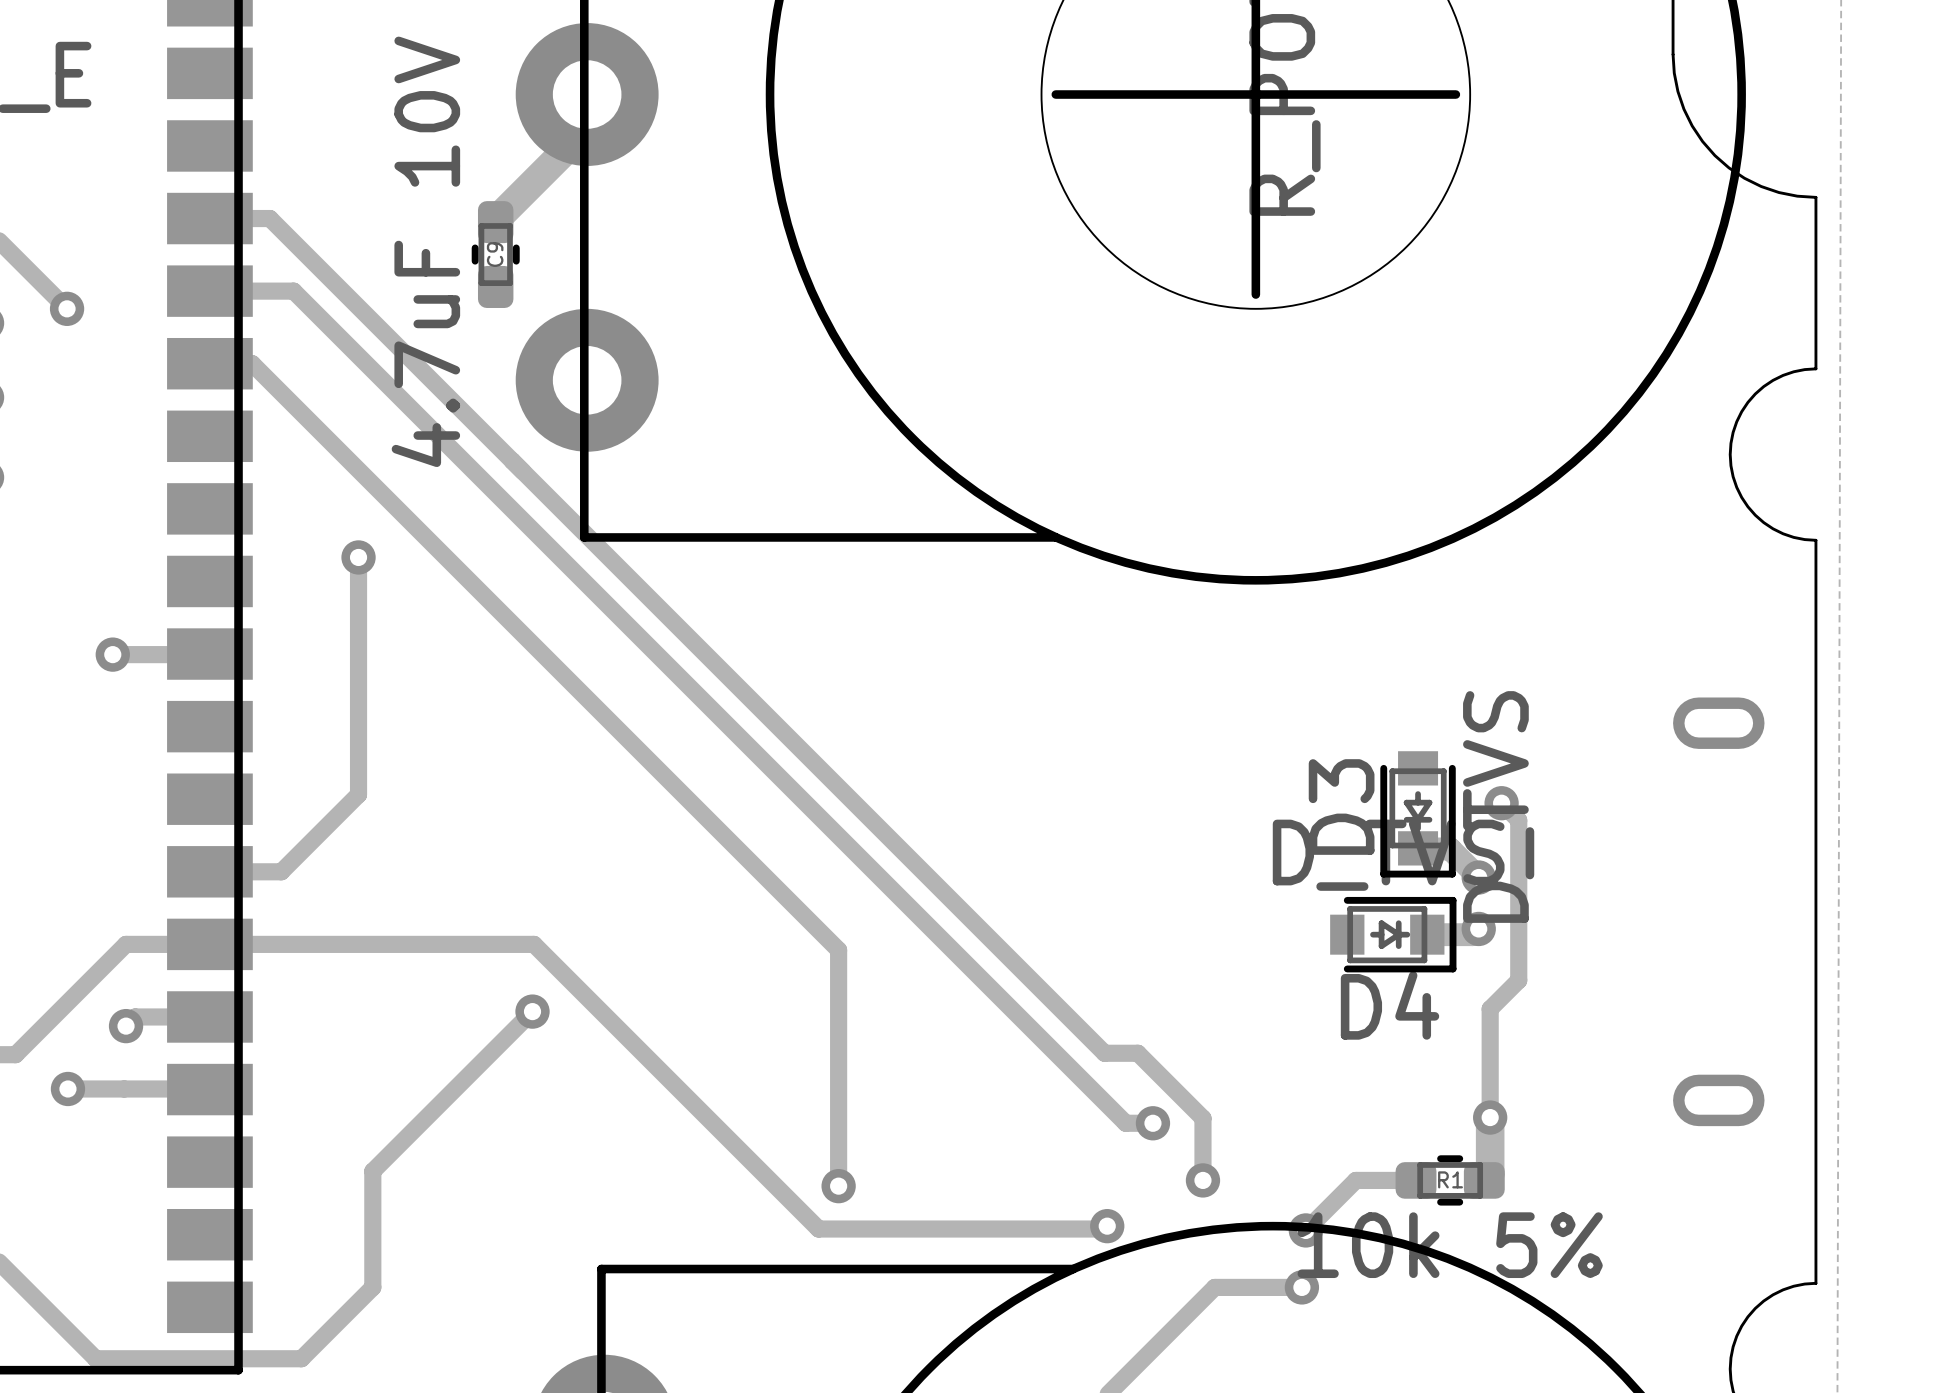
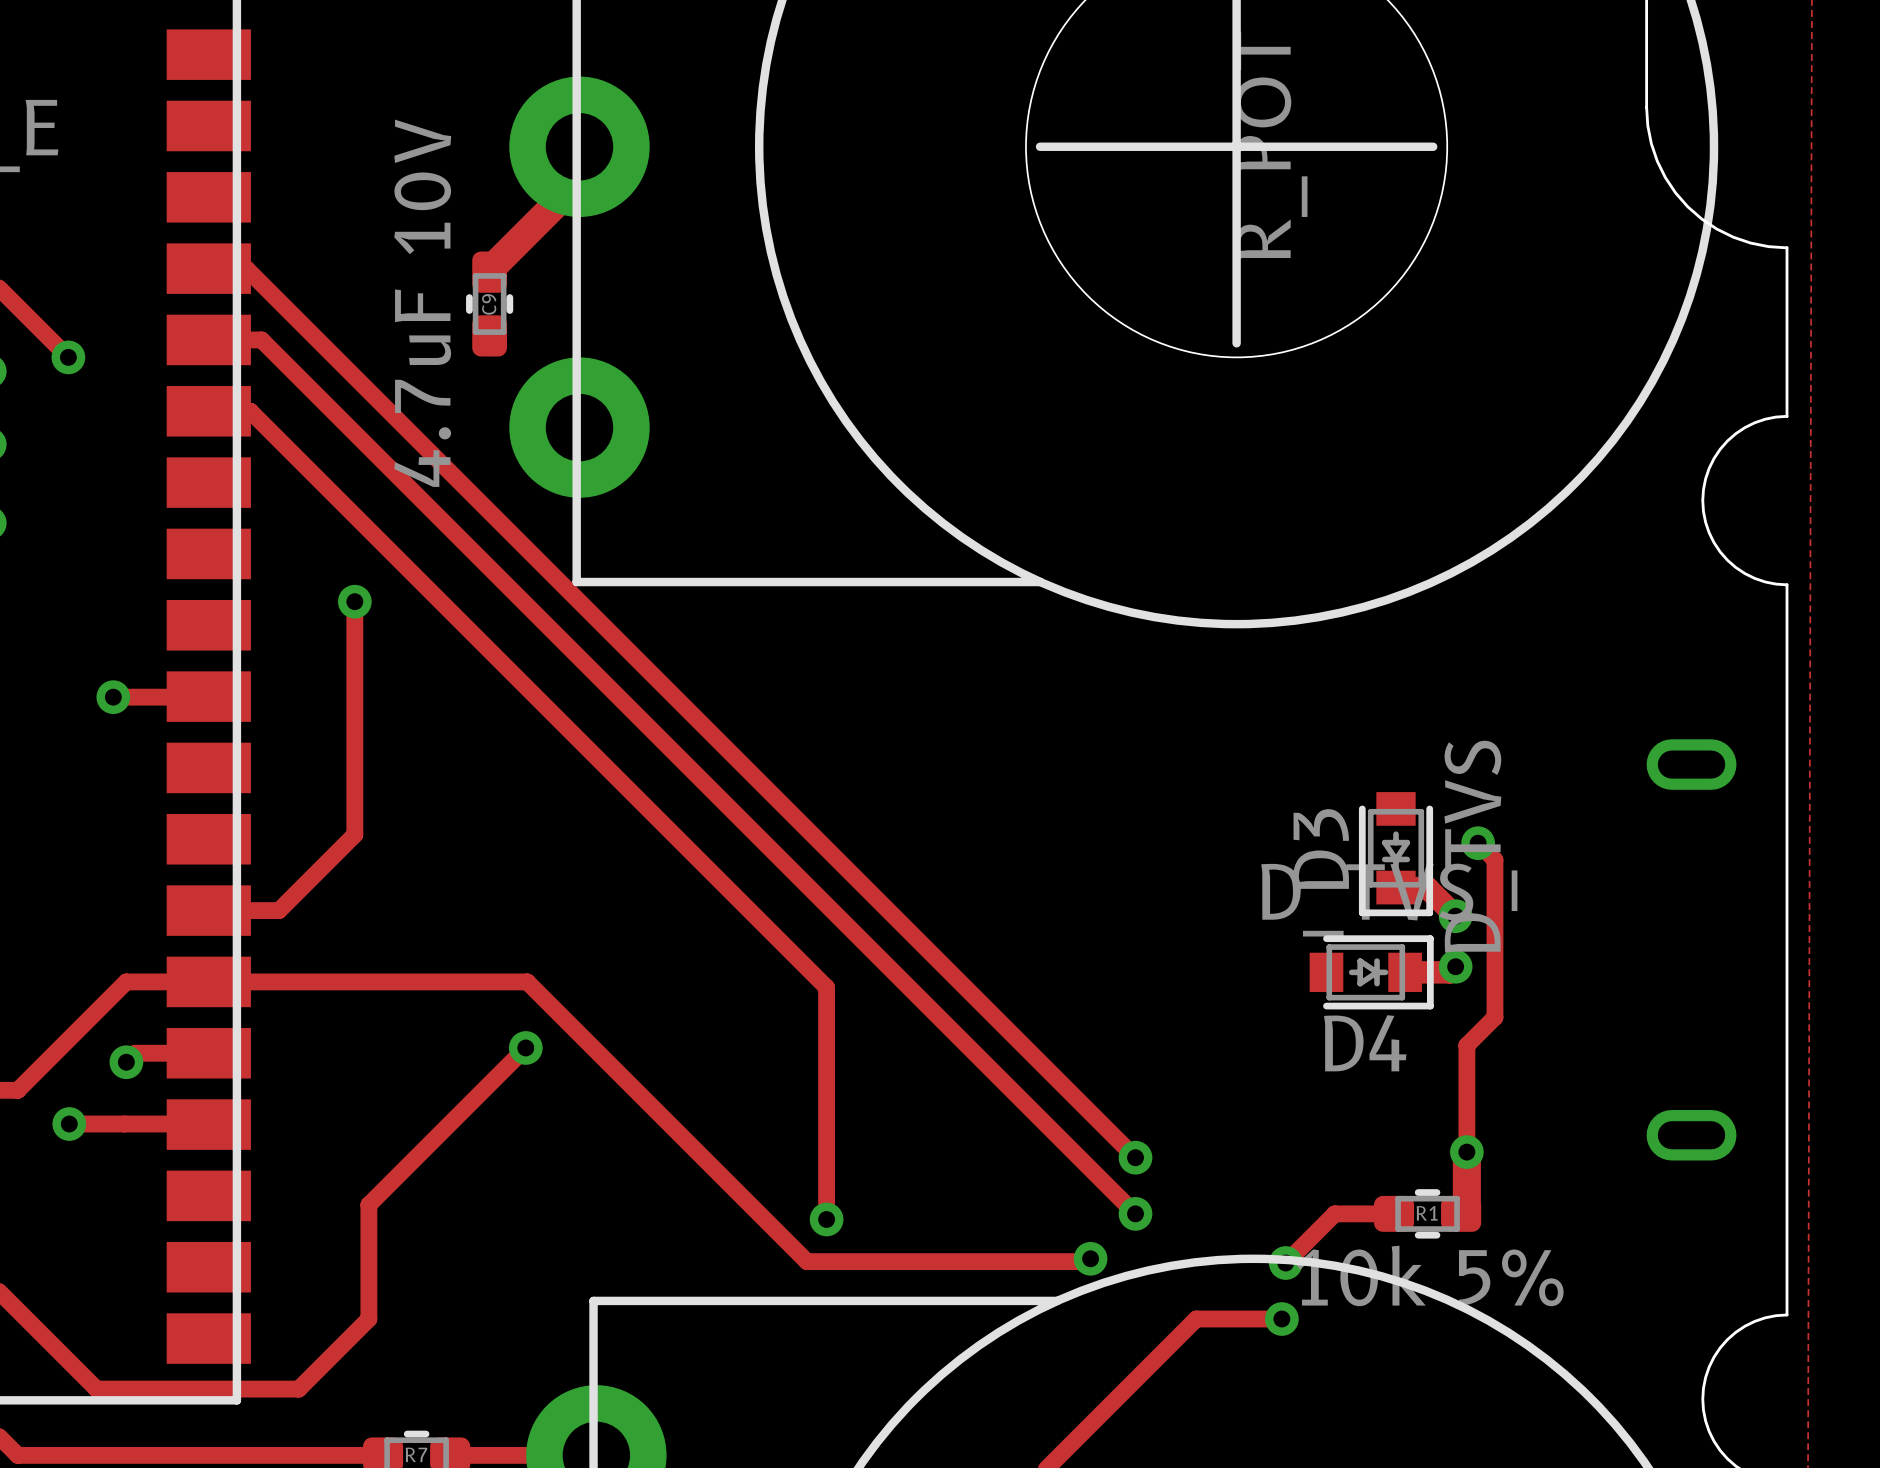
track: (248, 218) (269, 218) (1104, 1053) (1137, 1053) (1202, 1118) (1202, 1180) -> (246, 268) (1135, 1157)
track: (263, 291) (293, 291) (1125, 1123) (1152, 1123) -> (261, 339) (1135, 1213)
via position: (1202, 1180) -> (1135, 1213)

